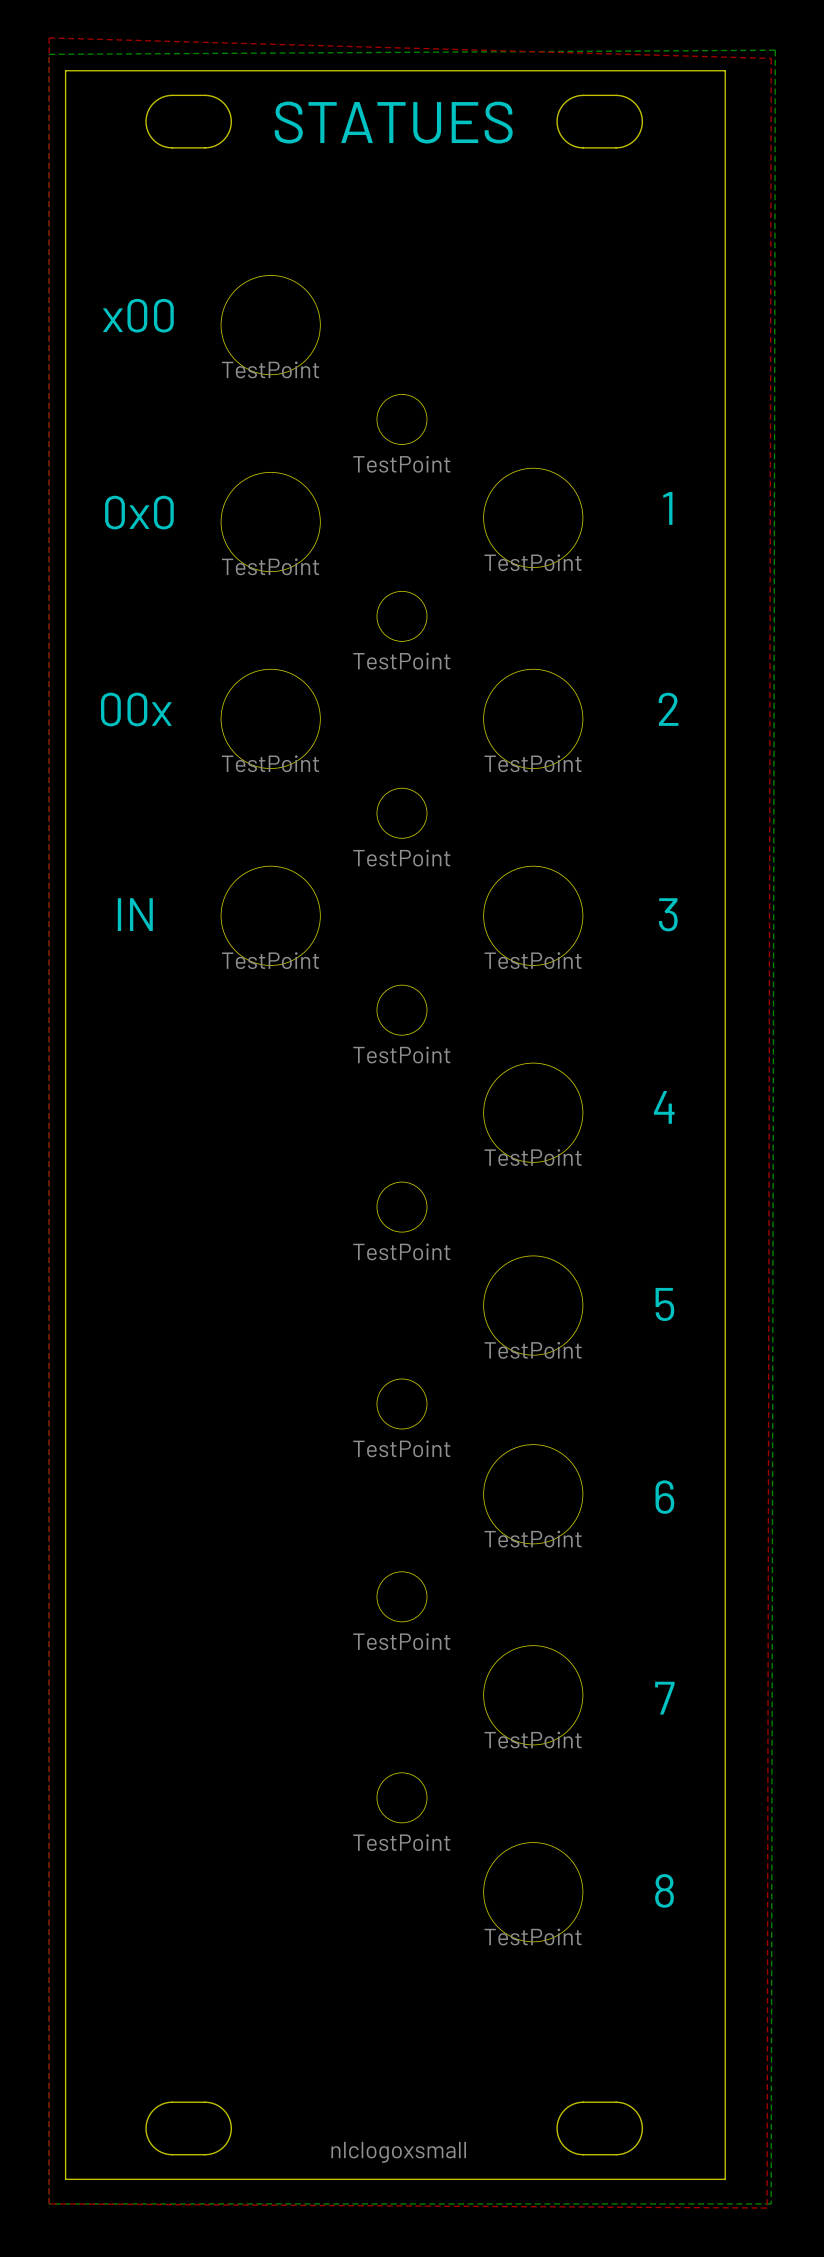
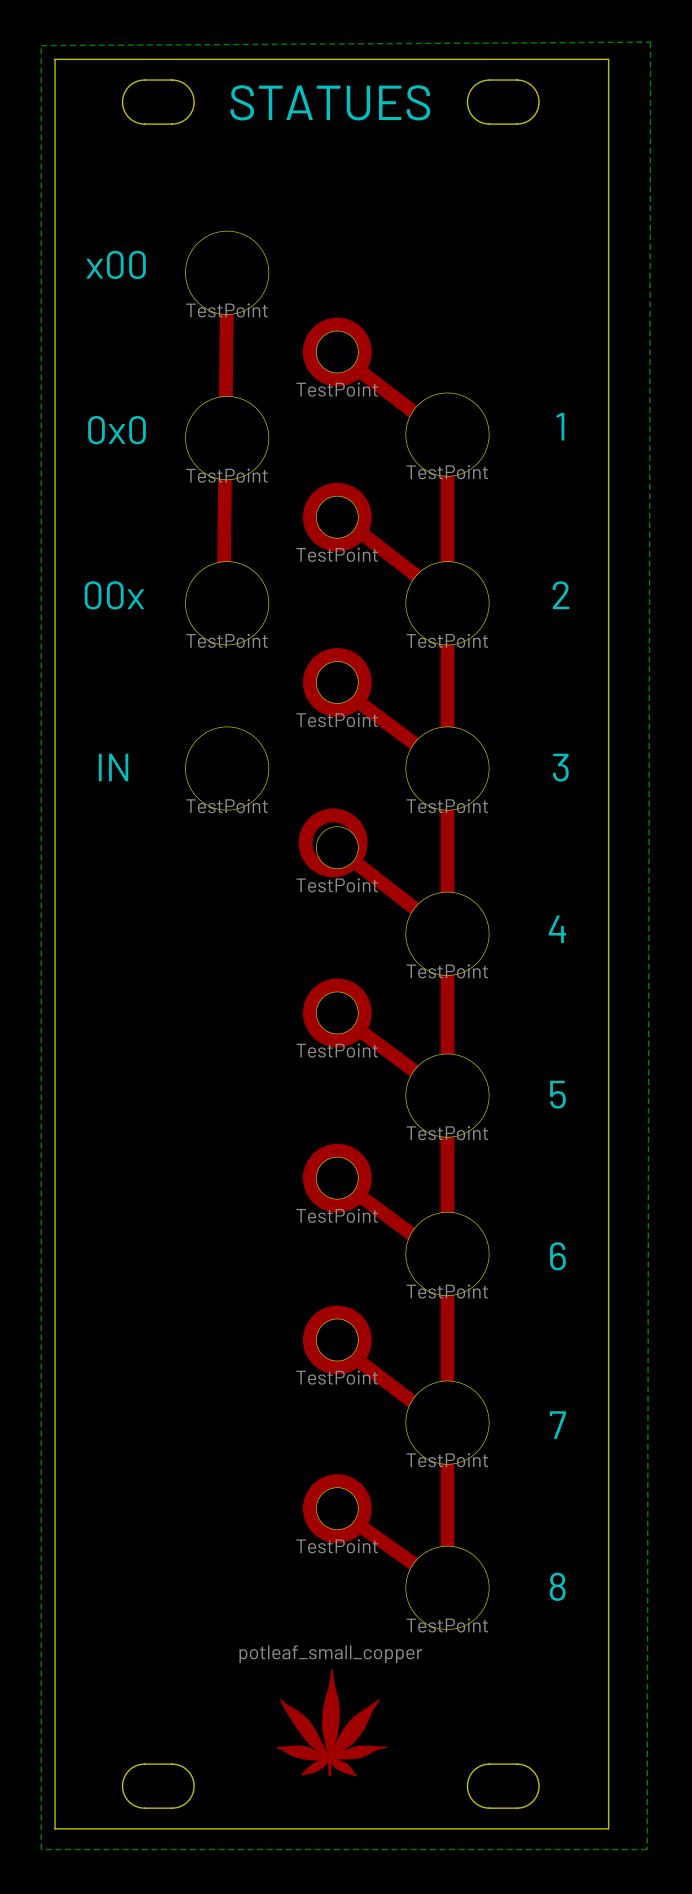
top zone outline: (49, 37) (49, 2203) (767, 2208) (771, 58) (49, 37) -> none
top track: none -> (227, 272) (223, 603)
drawing: none -> [302, 317, 372, 387]
top track: none -> (344, 358) (447, 438) (447, 1591)
drawing: none -> [302, 482, 372, 552]
top track: none -> (340, 517) (447, 599)
drawing: none -> [302, 648, 372, 717]
top track: none -> (337, 685) (447, 768)
drawing: none -> [298, 808, 368, 878]
top track: none -> (340, 851) (447, 933)
drawing: none -> [302, 978, 372, 1048]
top track: none -> (340, 1016) (447, 1095)
drawing: none -> [302, 1143, 372, 1213]
top track: none -> (340, 1181) (447, 1260)
drawing: none -> [302, 1305, 372, 1375]
top track: none -> (340, 1346) (444, 1426)
drawing: none -> [302, 1474, 372, 1544]
top track: none -> (340, 1512) (447, 1587)
drawing: none -> [276, 1668, 388, 1777]
drawing: [331, 2141, 467, 2163] -> none

